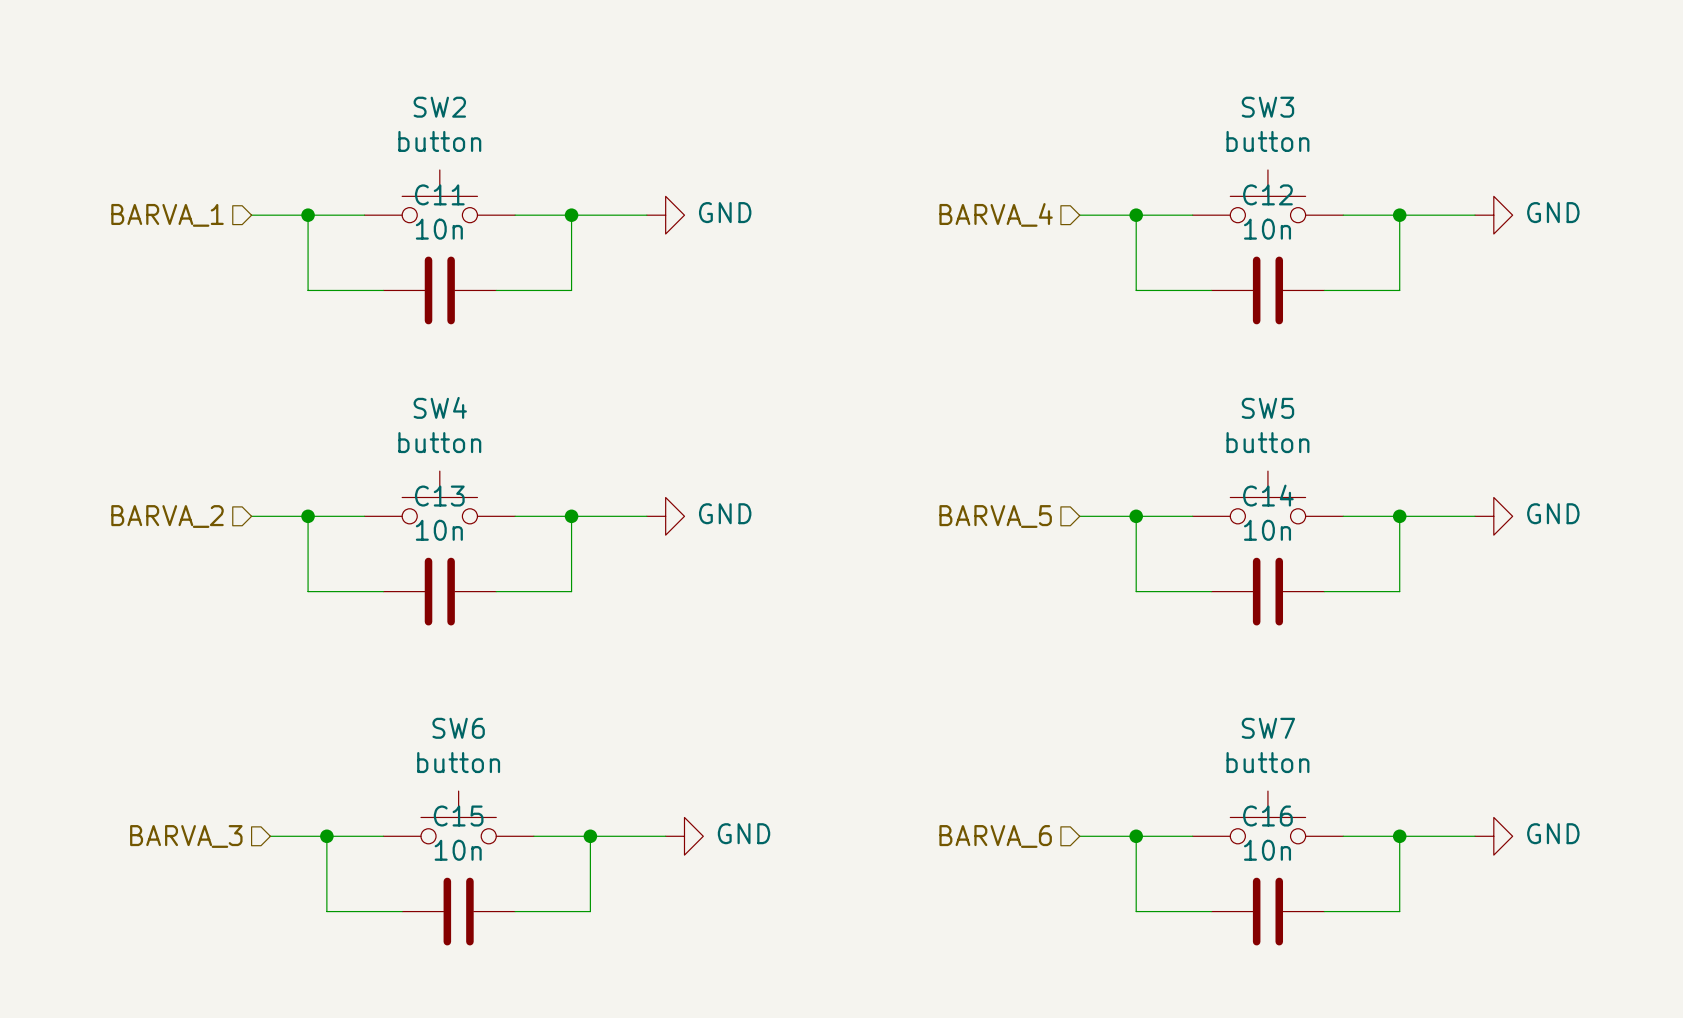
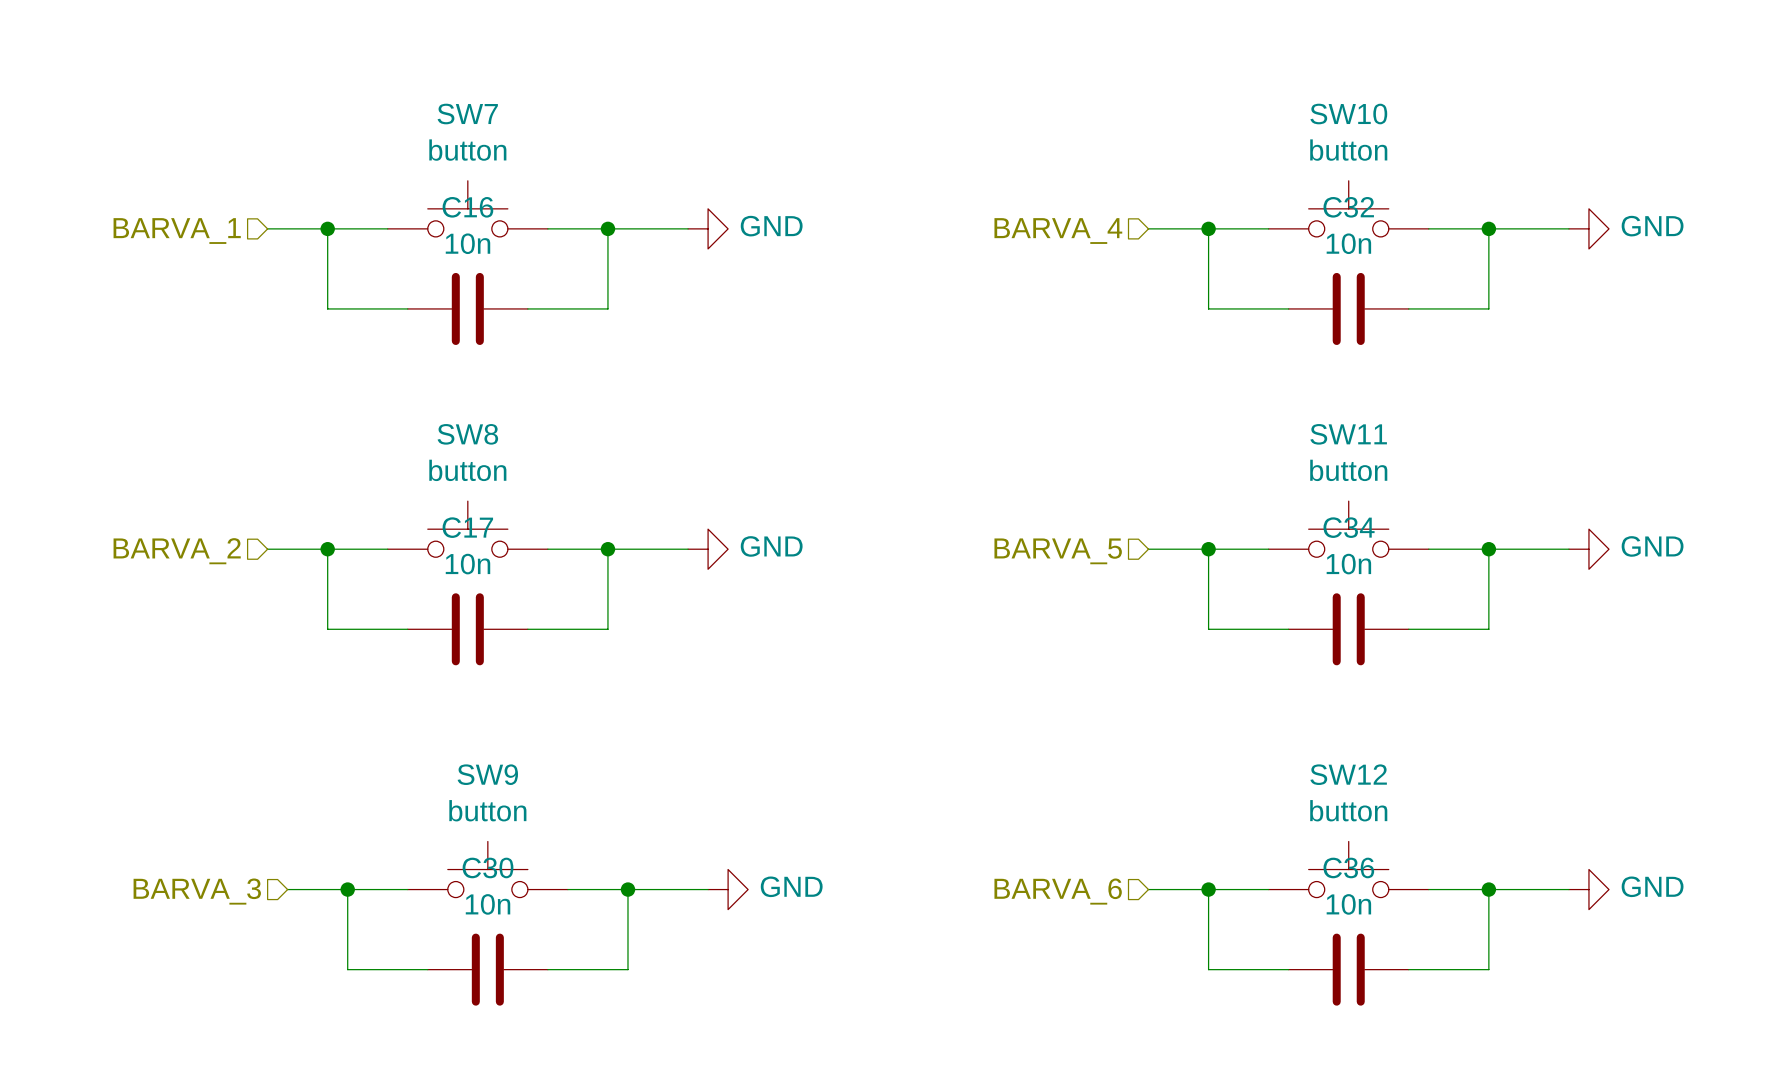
SW2 name: SW2 (439, 107) -> SW7 (467, 114)
SW3 name: SW3 (1267, 107) -> SW10 (1348, 114)
C11 name: C11 (439, 194) -> C16 (467, 207)
C12 name: C12 (1267, 194) -> C32 (1348, 207)
SW4 name: SW4 (440, 407) -> SW8 (467, 434)
SW5 name: SW5 (1267, 408) -> SW11 (1348, 434)
C14 name: C14 (1268, 495) -> C34 (1349, 527)
C13 name: C13 (439, 496) -> C17 (467, 527)
SW6 name: SW6 (458, 728) -> SW9 (487, 774)
SW7 name: SW7 (1268, 728) -> SW12 (1348, 774)
C15 name: C15 (458, 816) -> C30 (488, 867)
C16 name: C16 (1267, 816) -> C36 (1348, 867)

